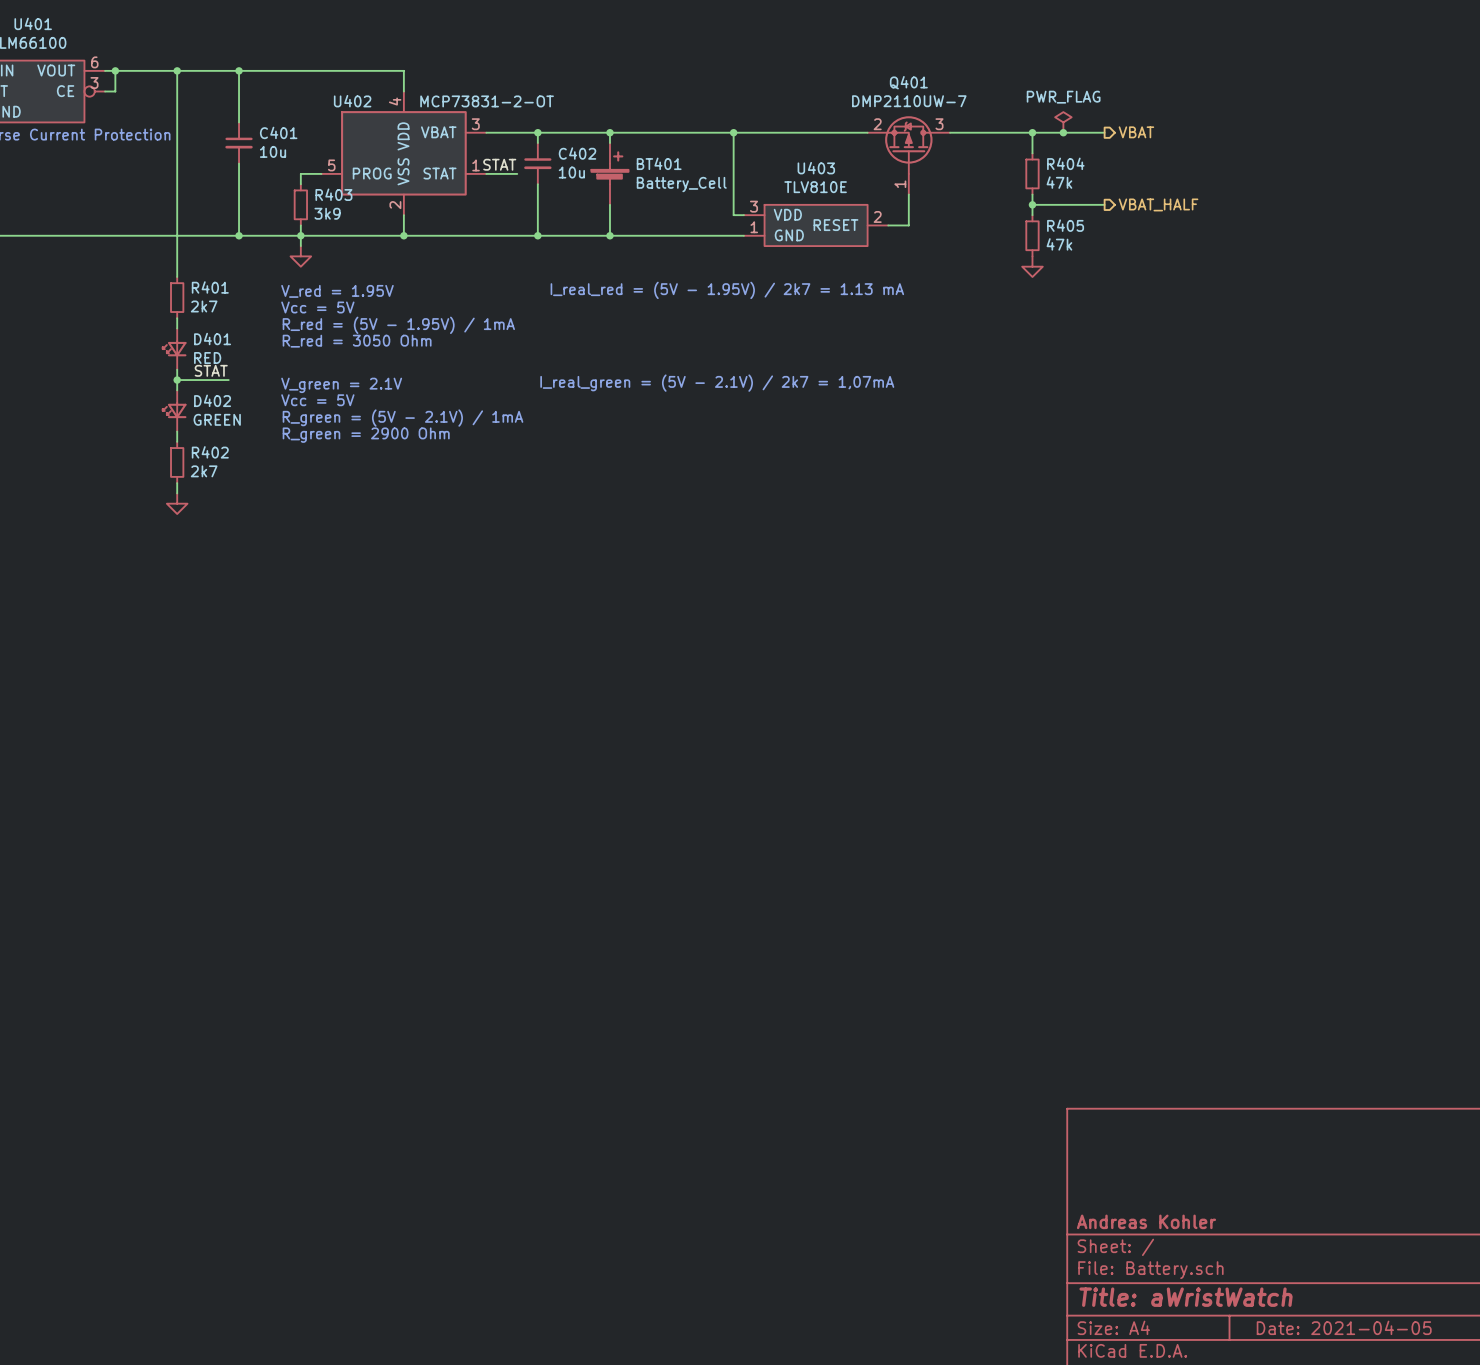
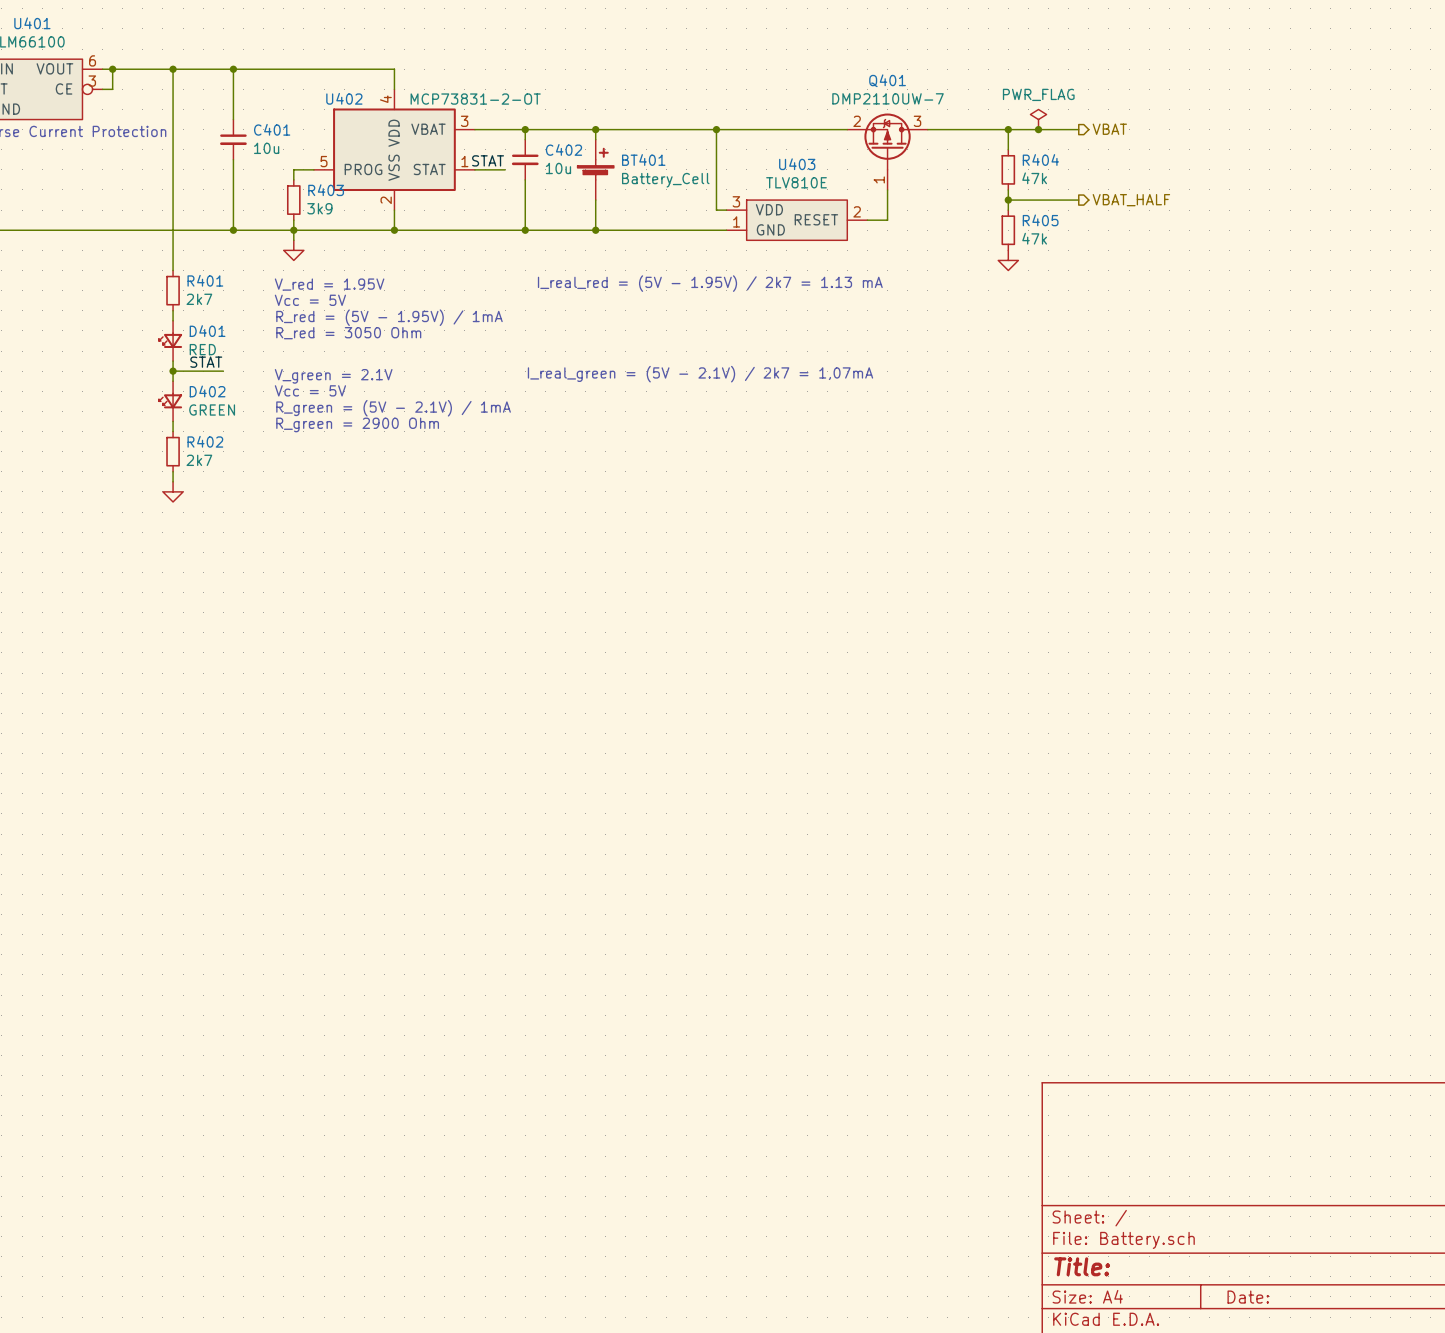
title block: Andreas Kohler (1146, 1221) -> none
title block: Title: aWristWatch (1186, 1297) -> Title: (1082, 1266)
title block: Date: 2021-04-05 (1344, 1327) -> Date: (1248, 1297)

